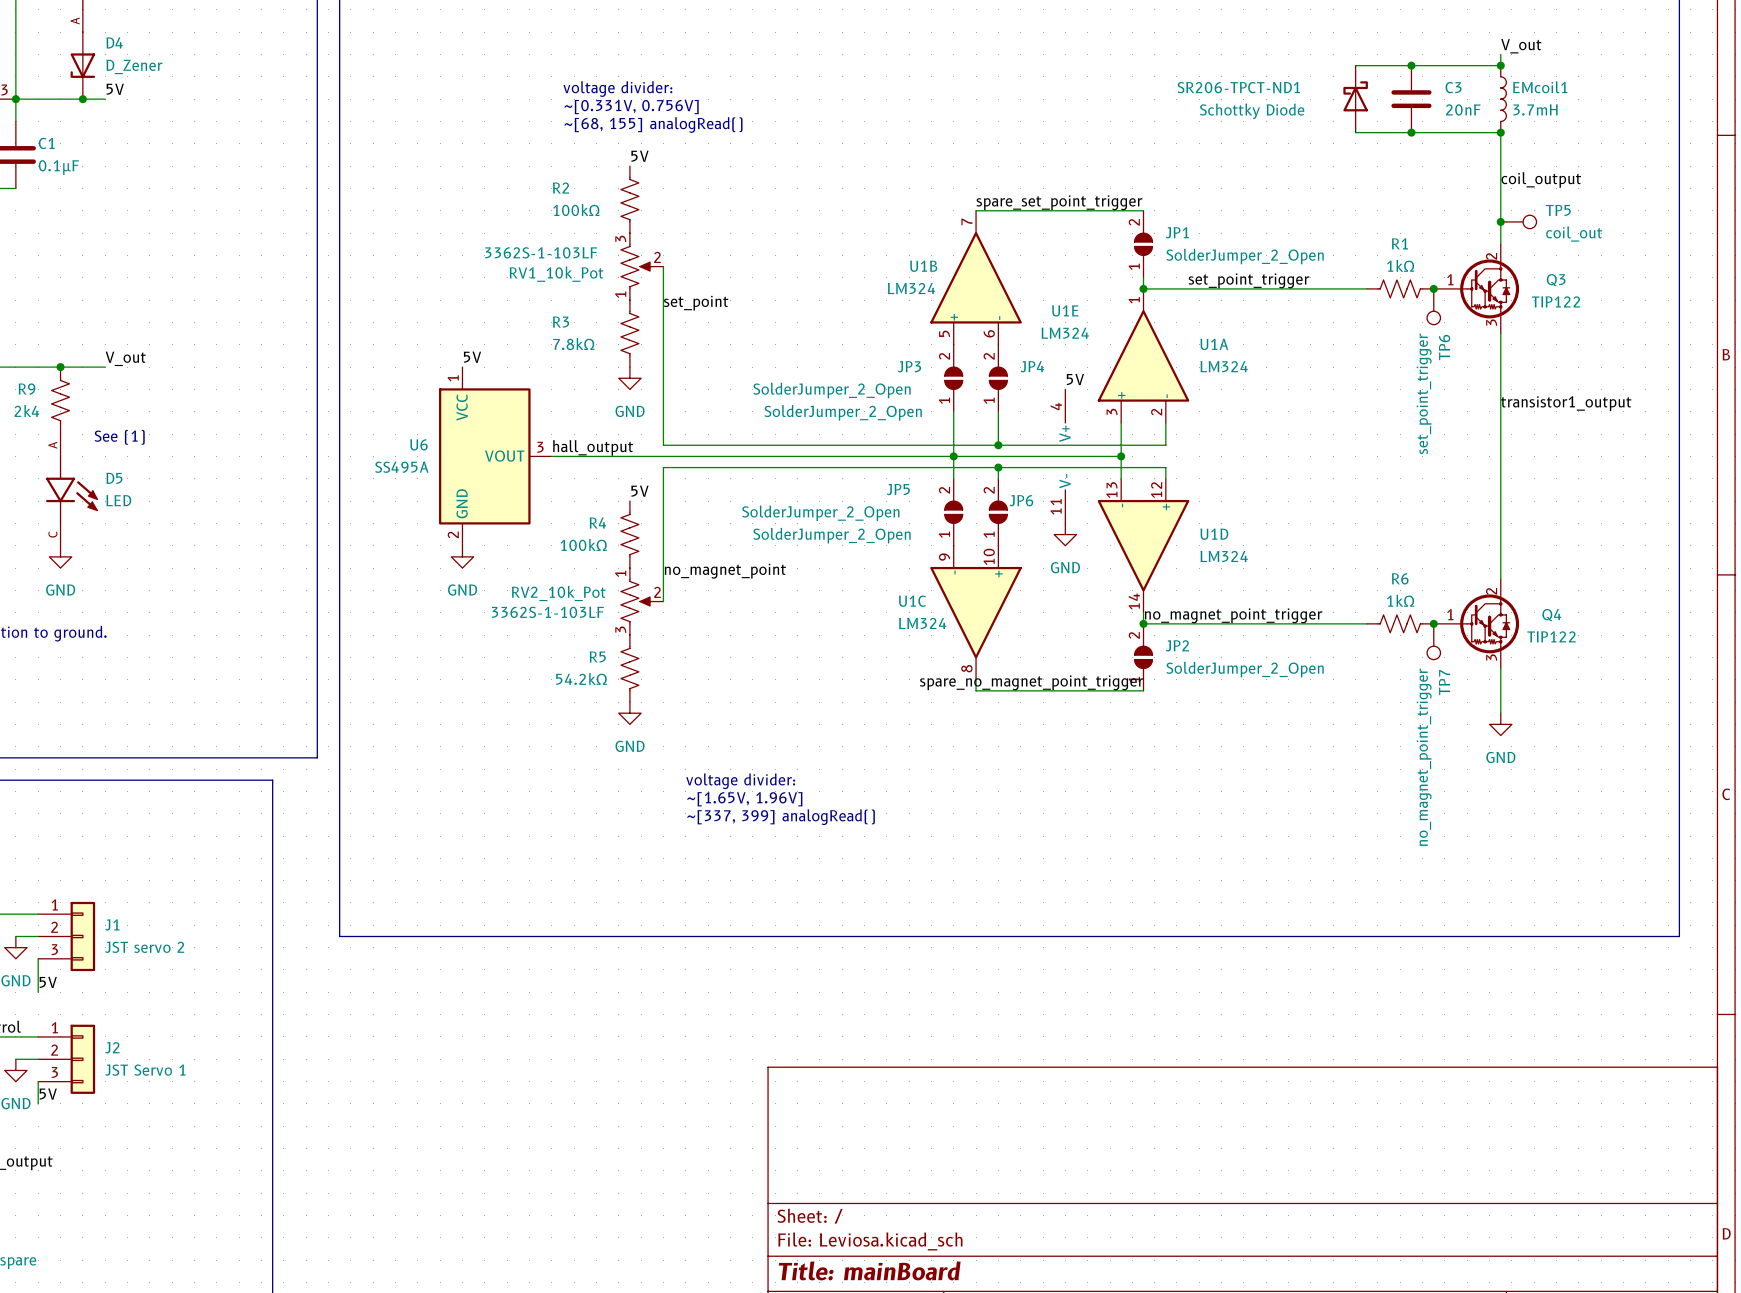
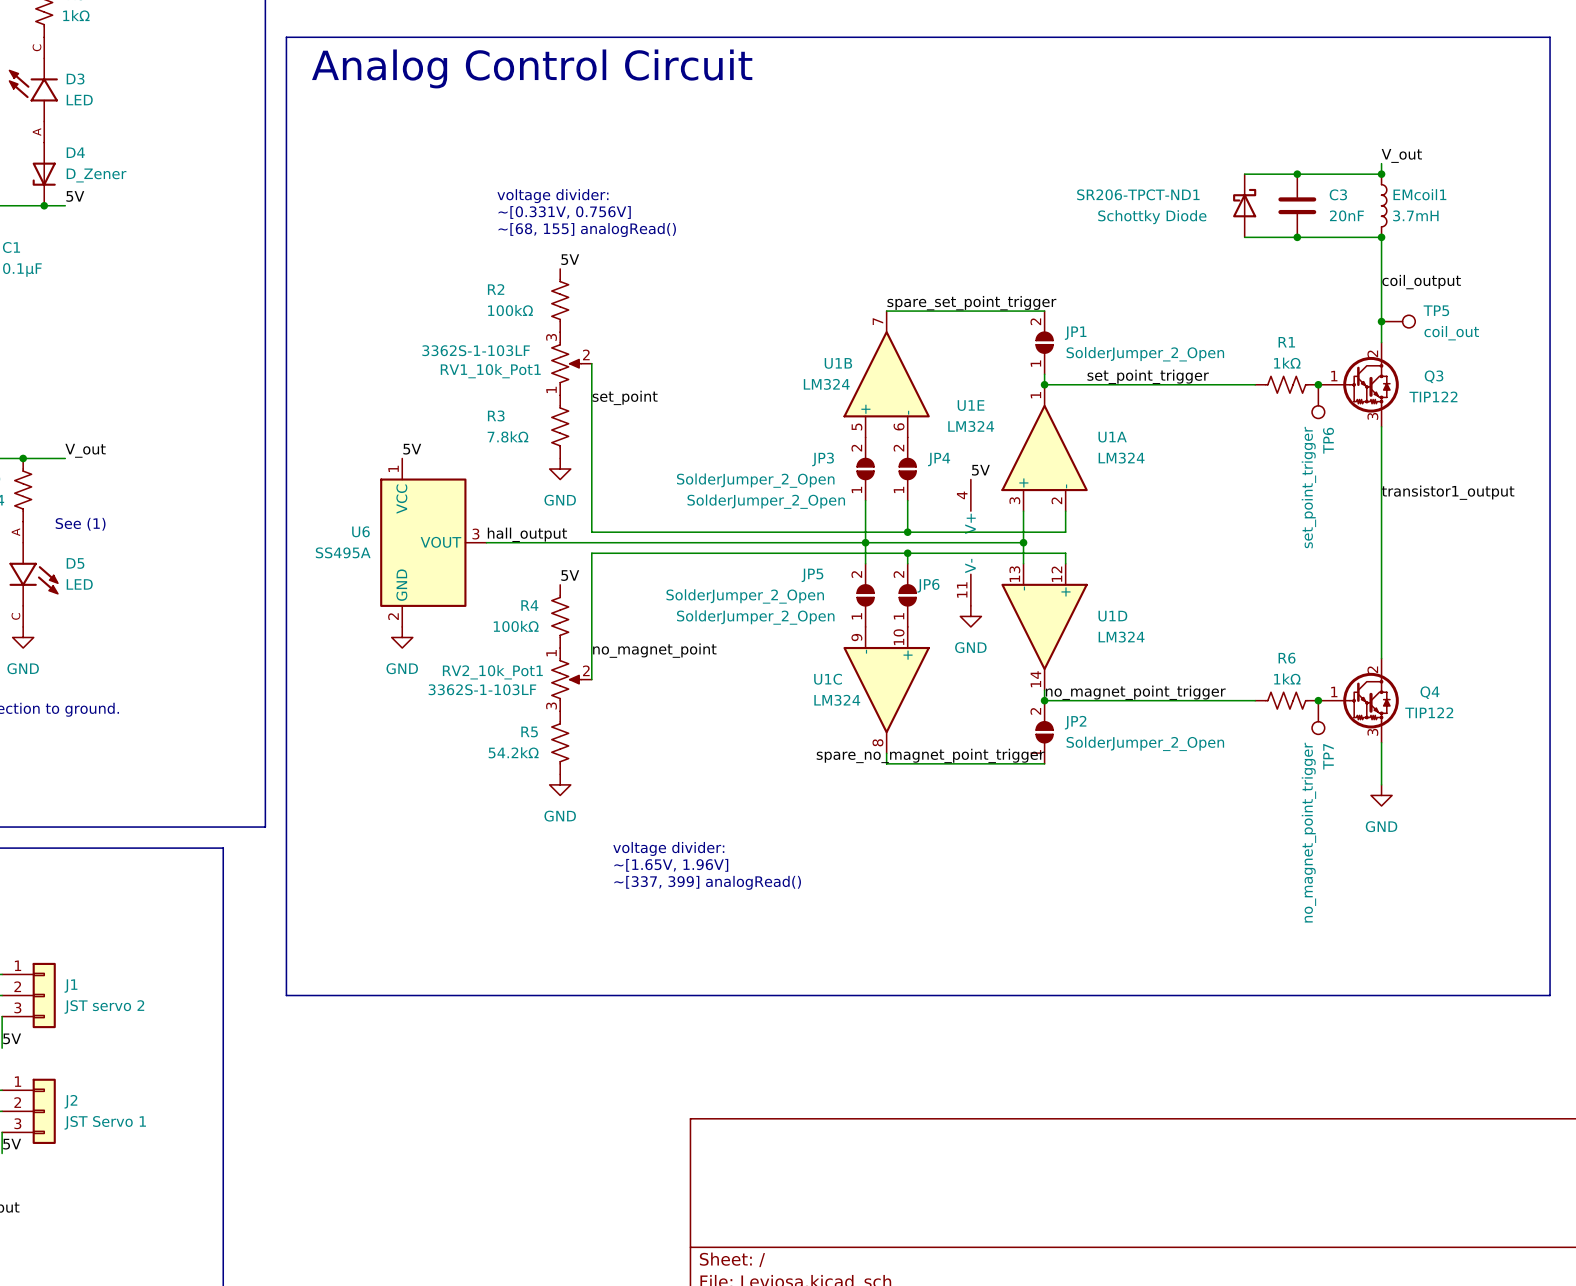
RV1_10k_Pot name: RV1_10k_Pot (556, 274) -> RV1_10k_Pot1 (490, 371)
RV2_10k_Pot name: RV2_10k_Pot (558, 593) -> RV2_10k_Pot1 (492, 672)

